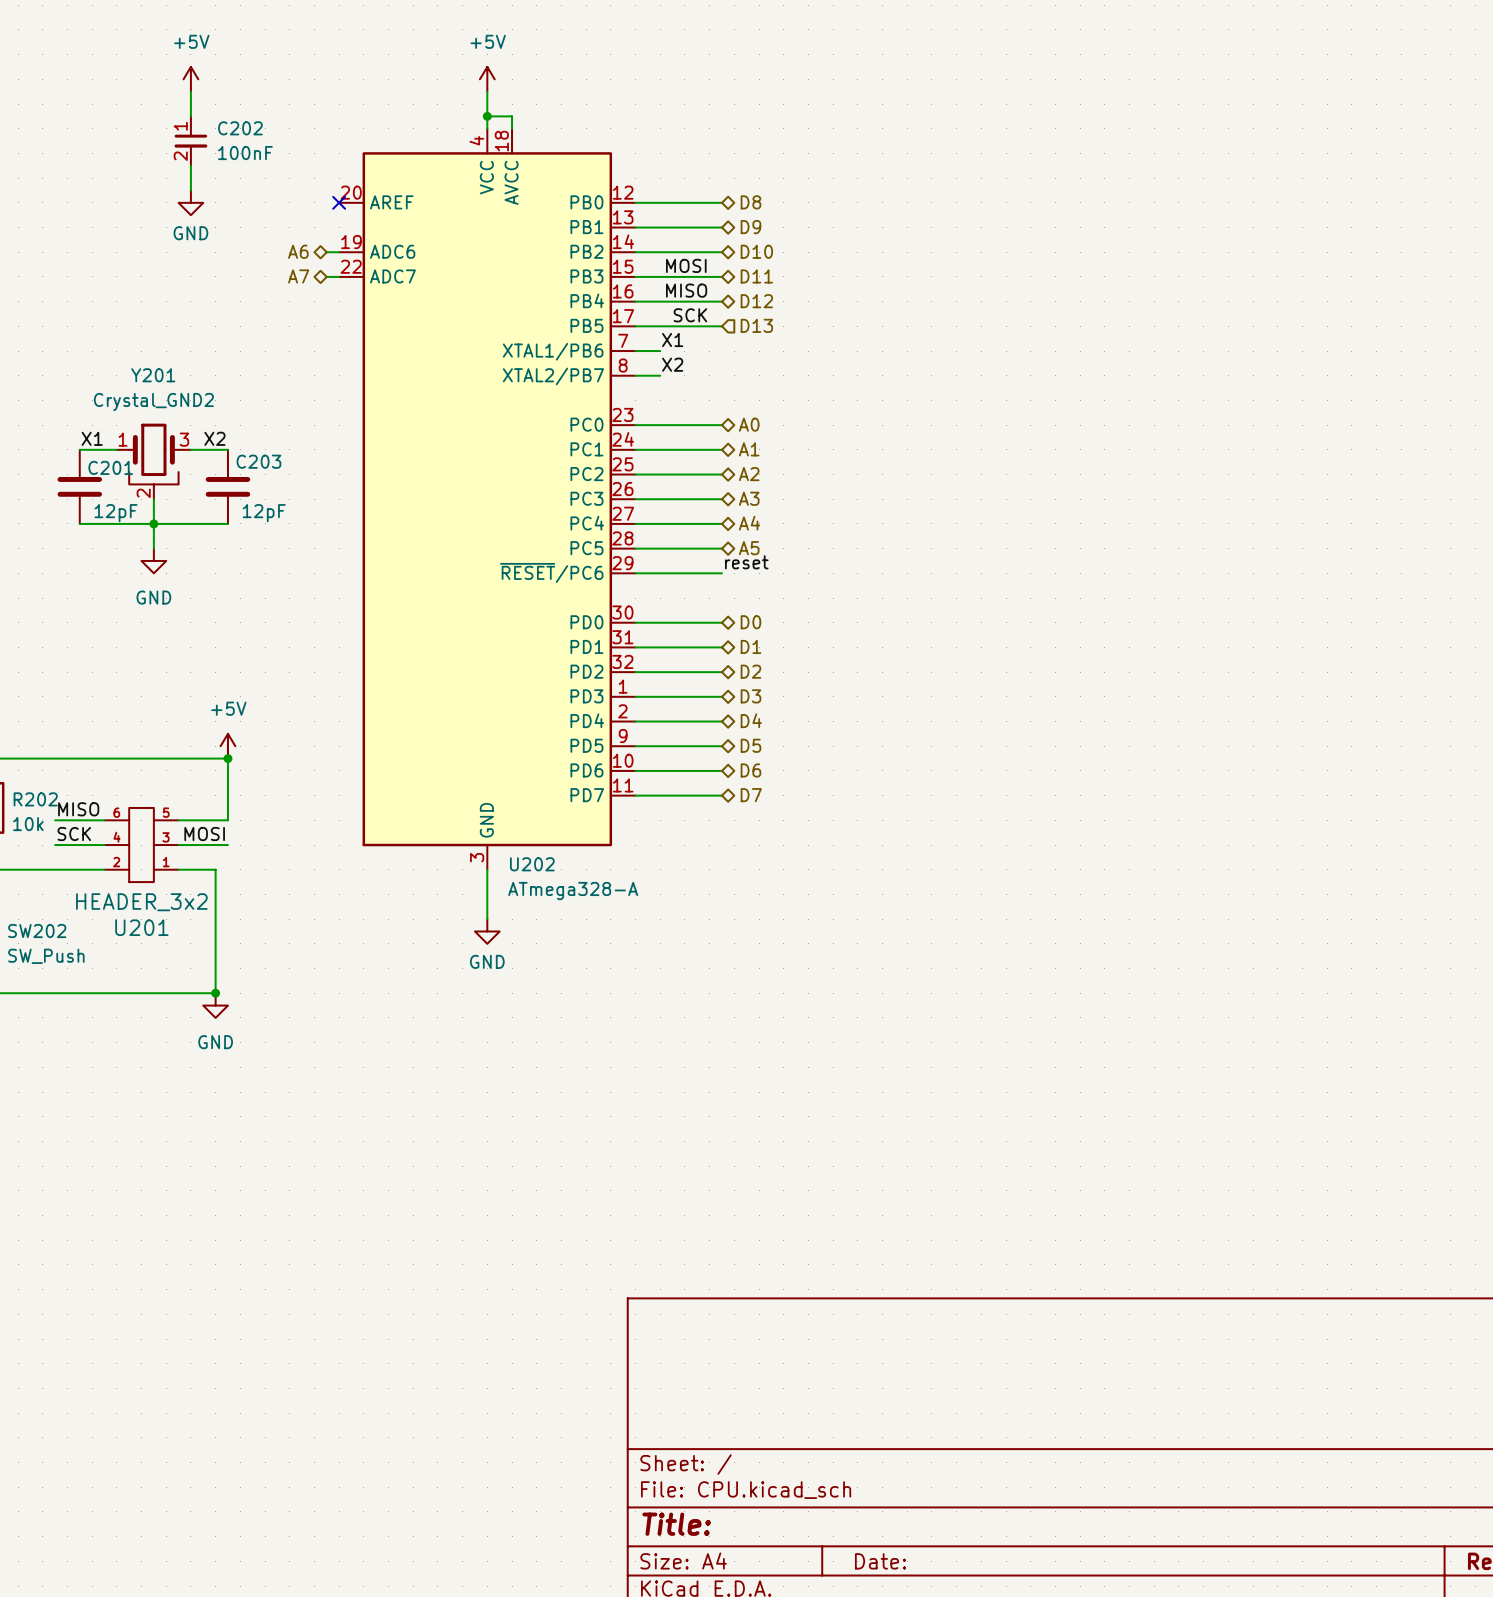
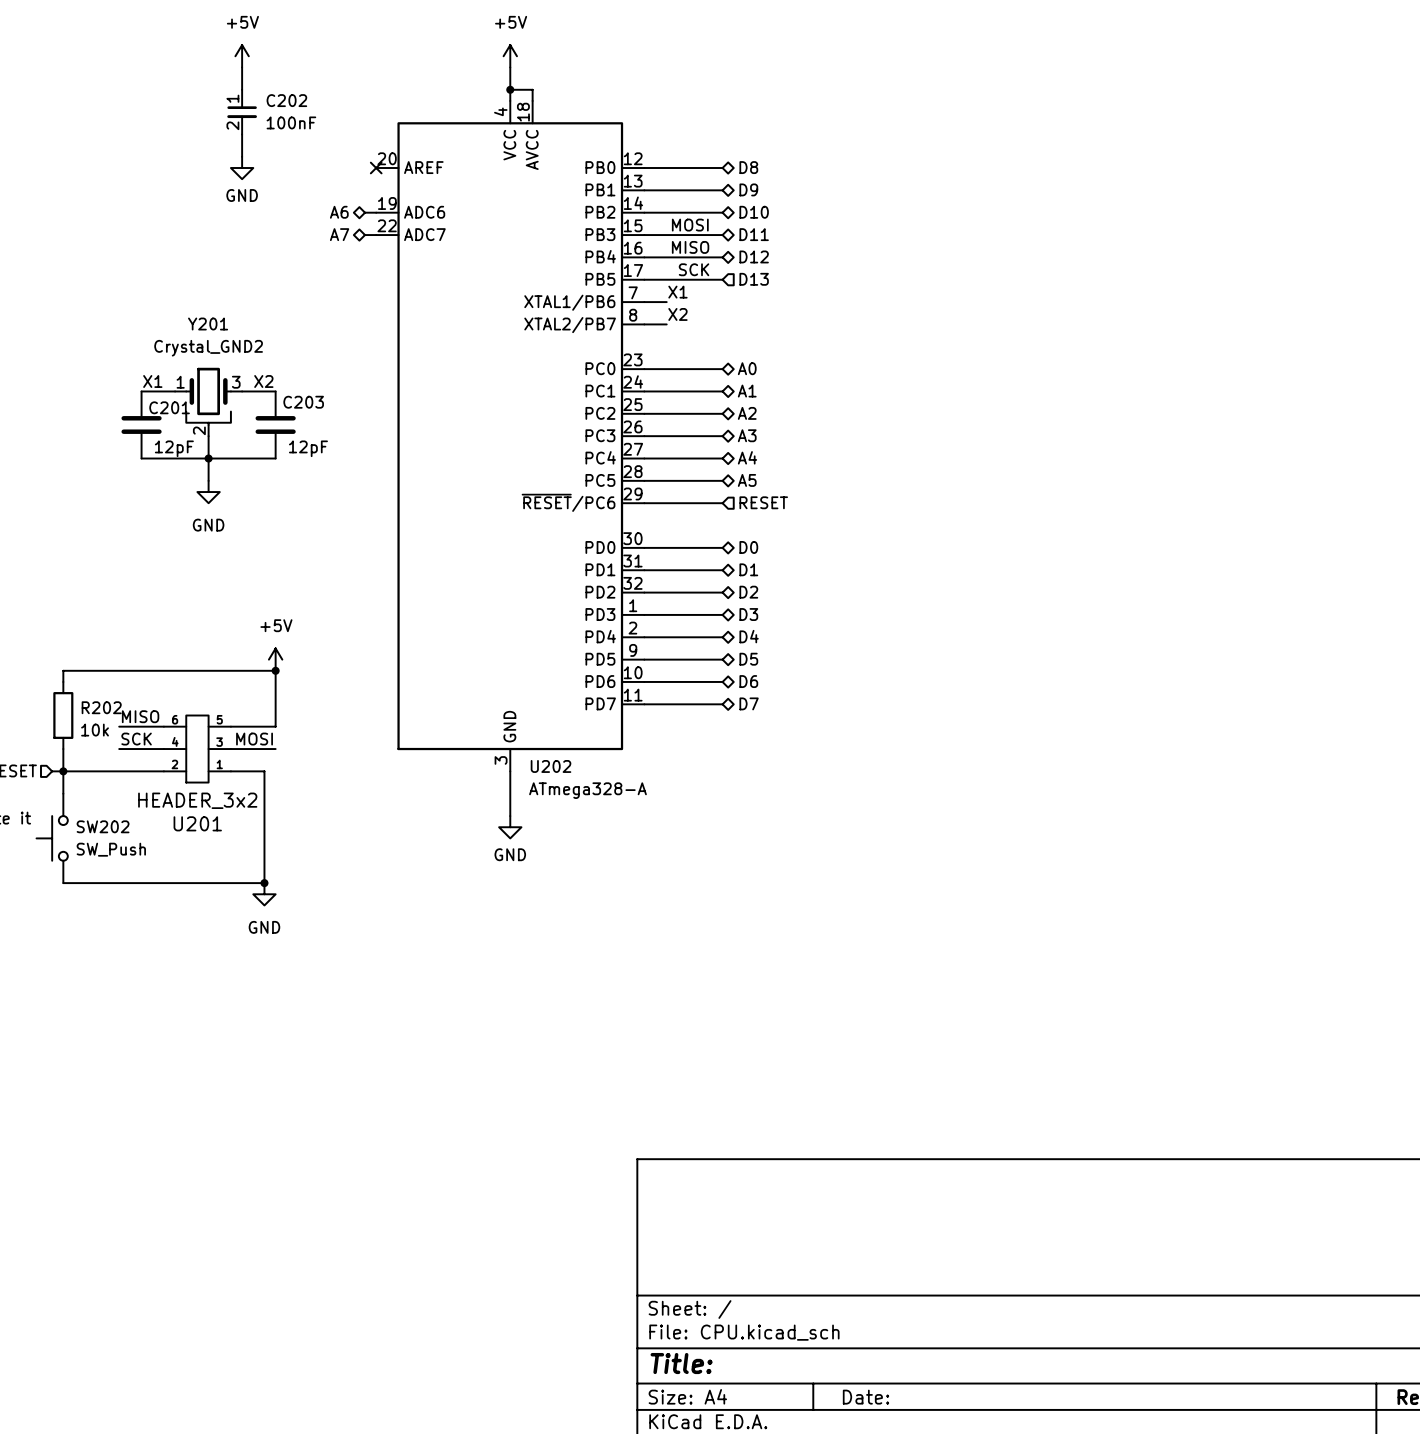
label: reset (746, 562) -> none
hierarchical label: none -> RESET (763, 502)

